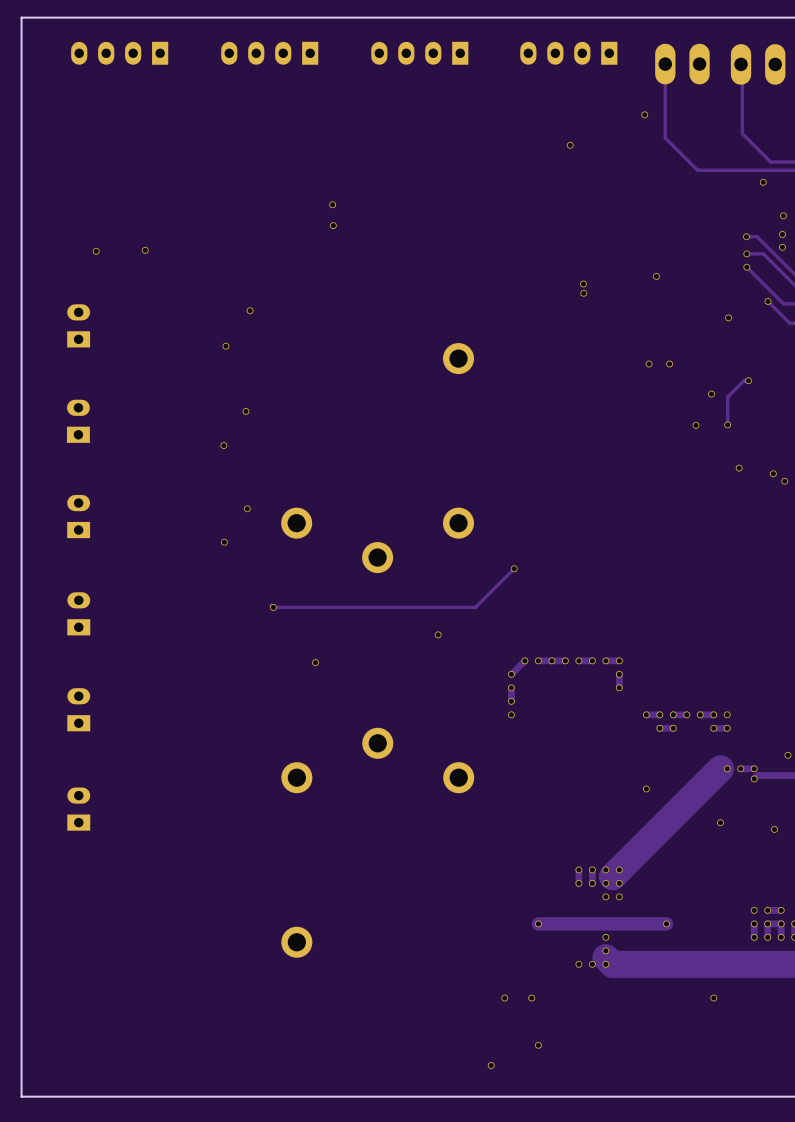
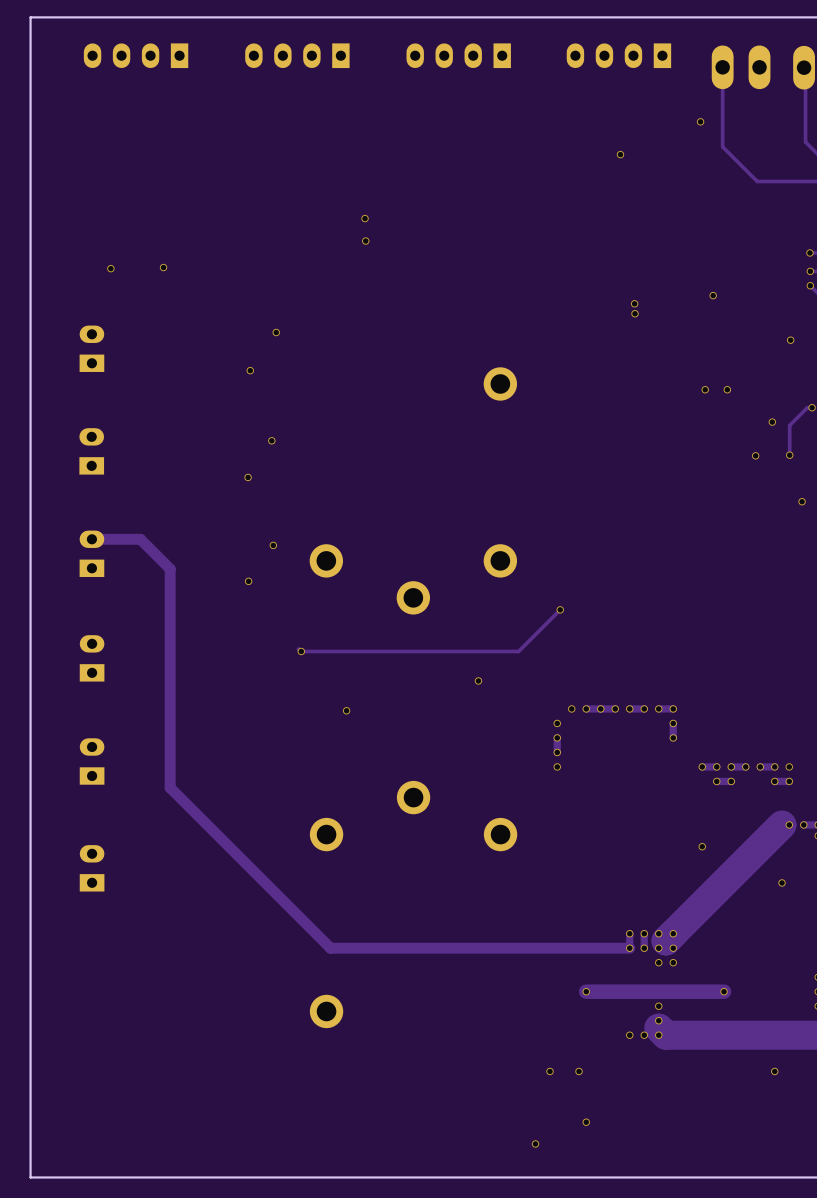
track: none -> (91, 539) (140, 539) (170, 568) (170, 787) (330, 948) (629, 948)
track: (524, 660) (511, 674) -> none

